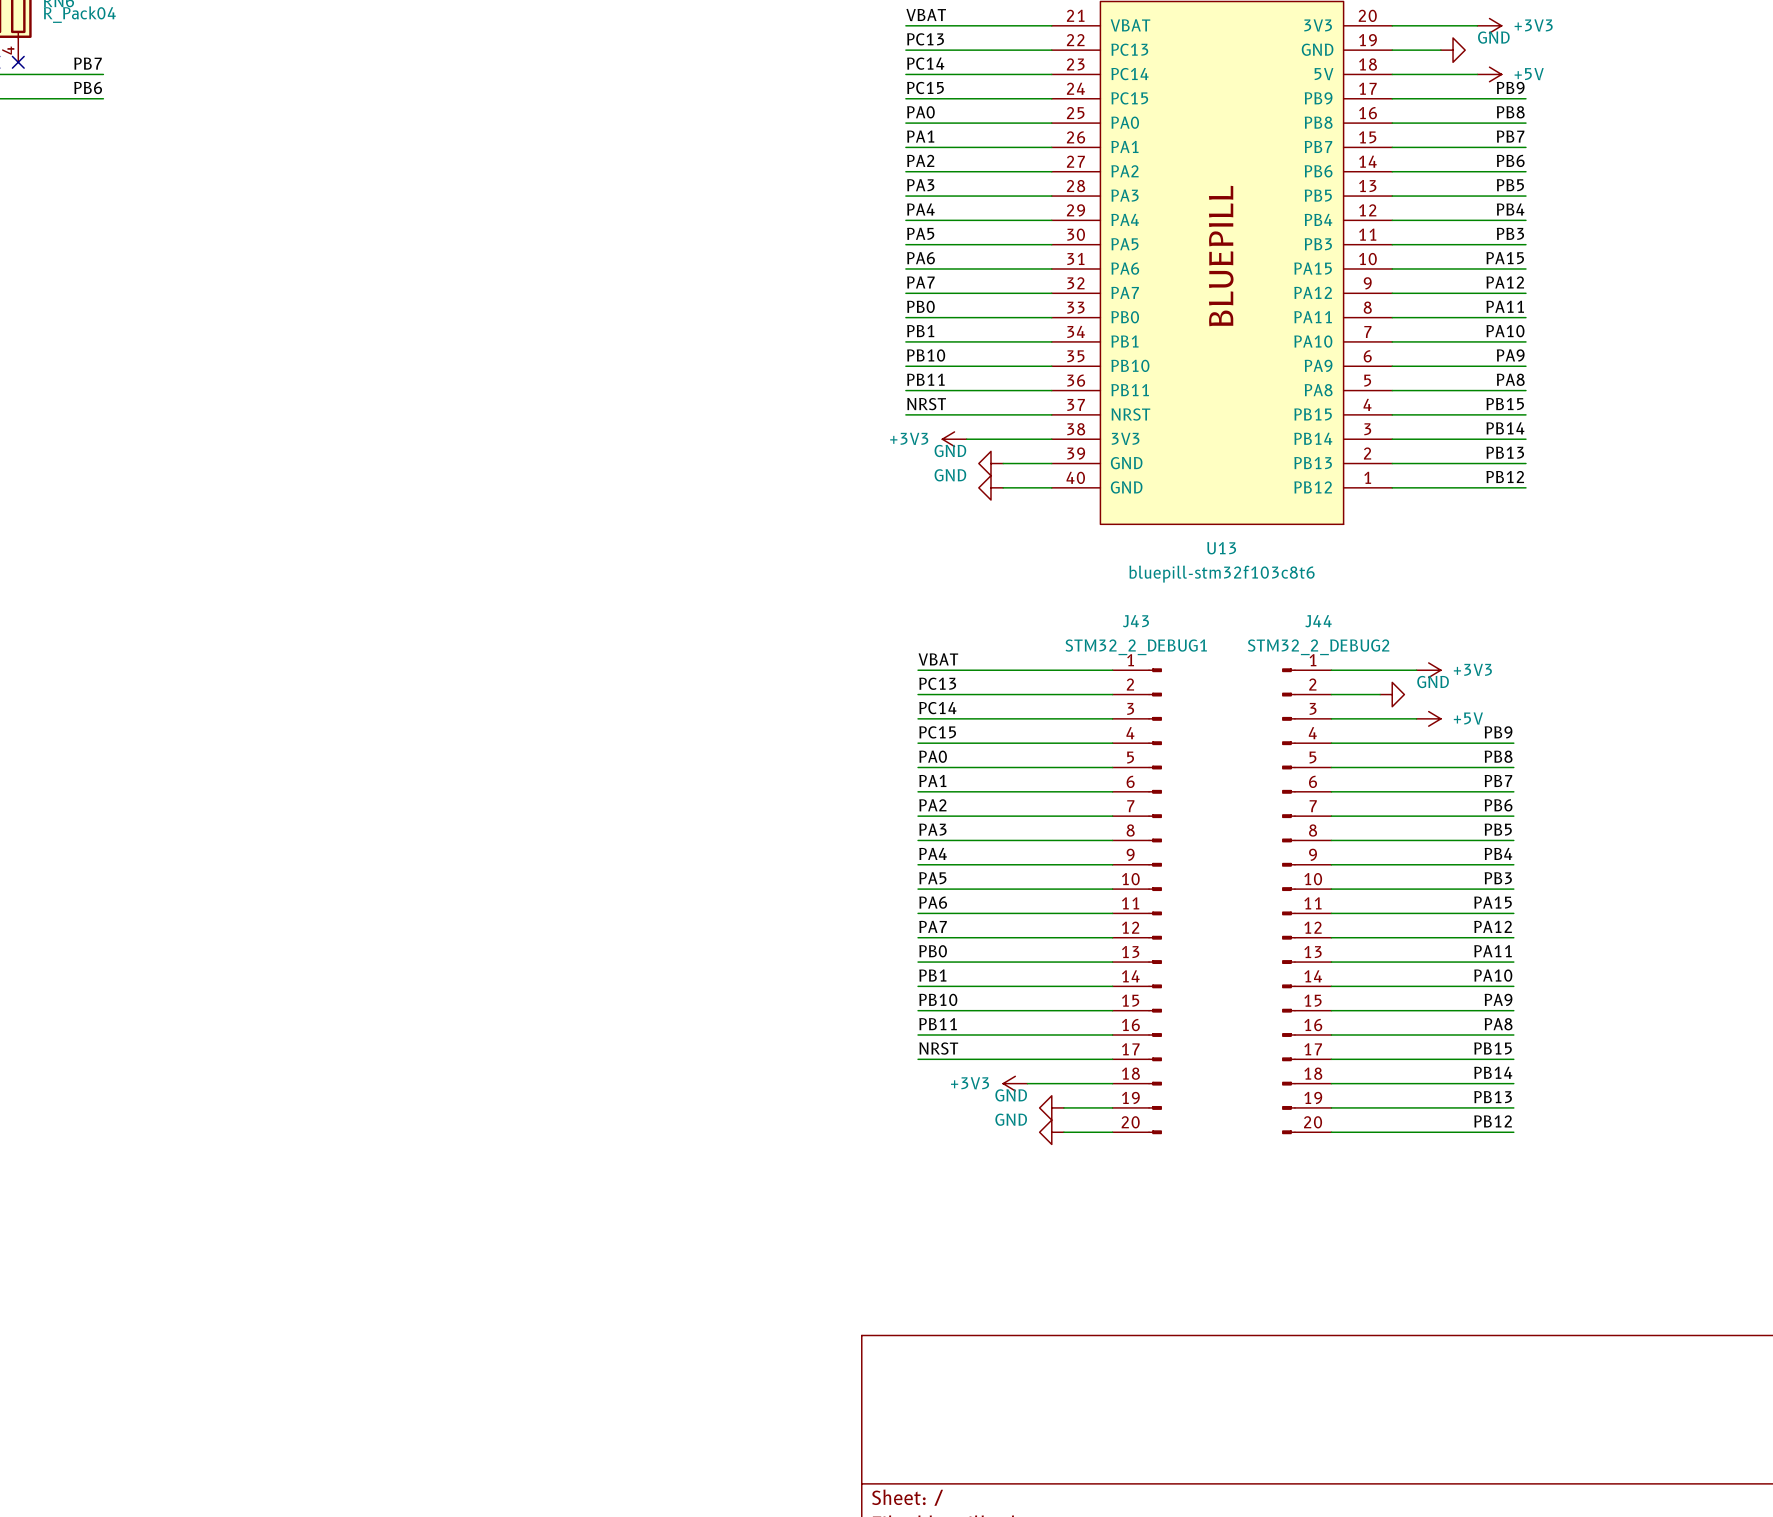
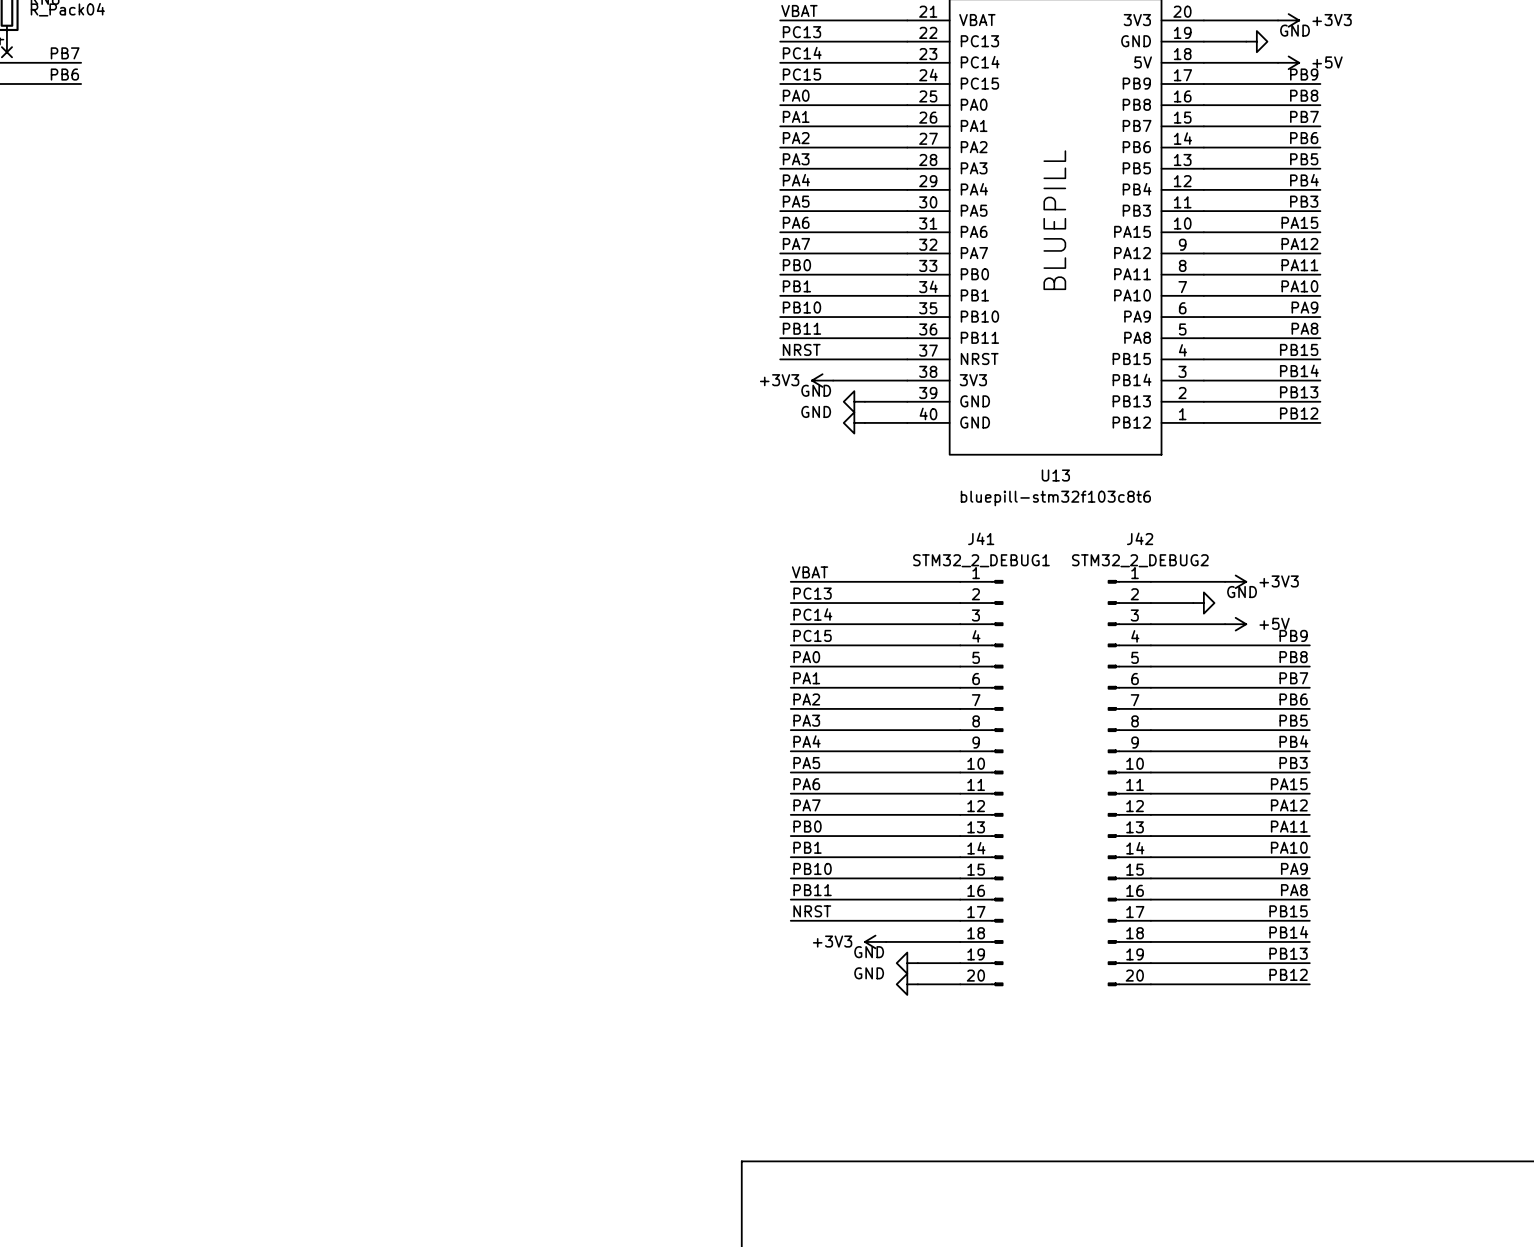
J43 name: J43 (1135, 621) -> J41 (981, 538)
J44 name: J44 (1318, 621) -> J42 (1140, 538)

